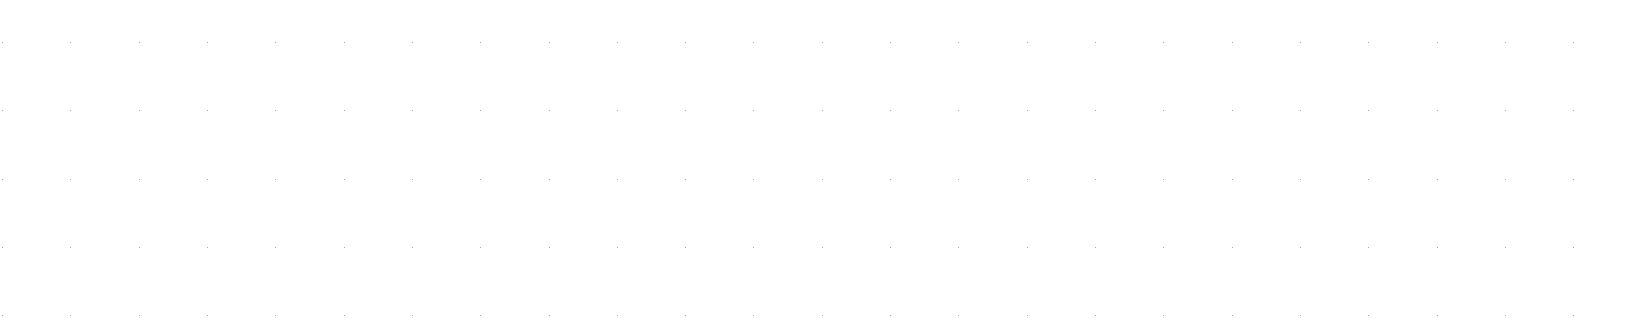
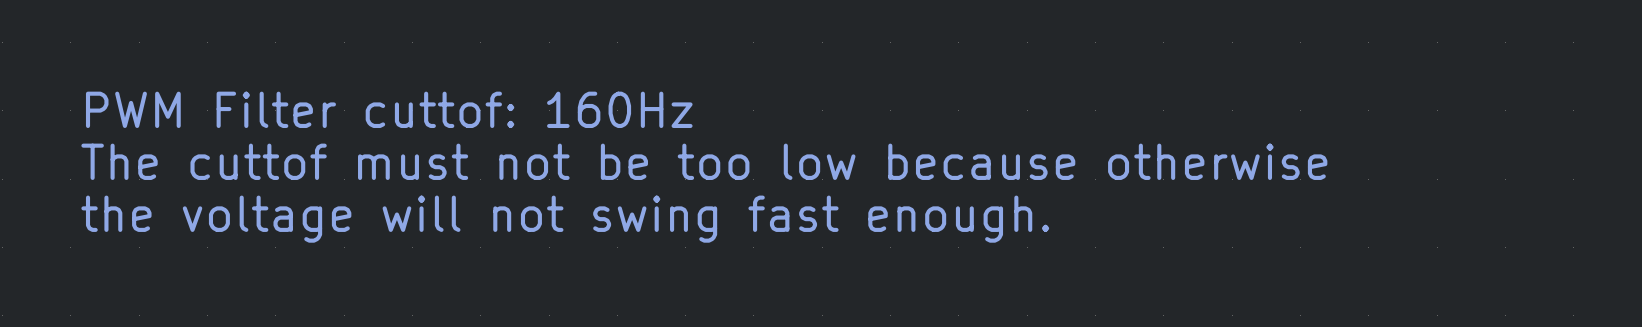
text: none -> PWM Filter cuttof: 160Hz (389, 109)
text: none -> The cuttof must not be too low because otherwise (704, 161)
text: none -> the voltage will not swing fast enough. (565, 219)

